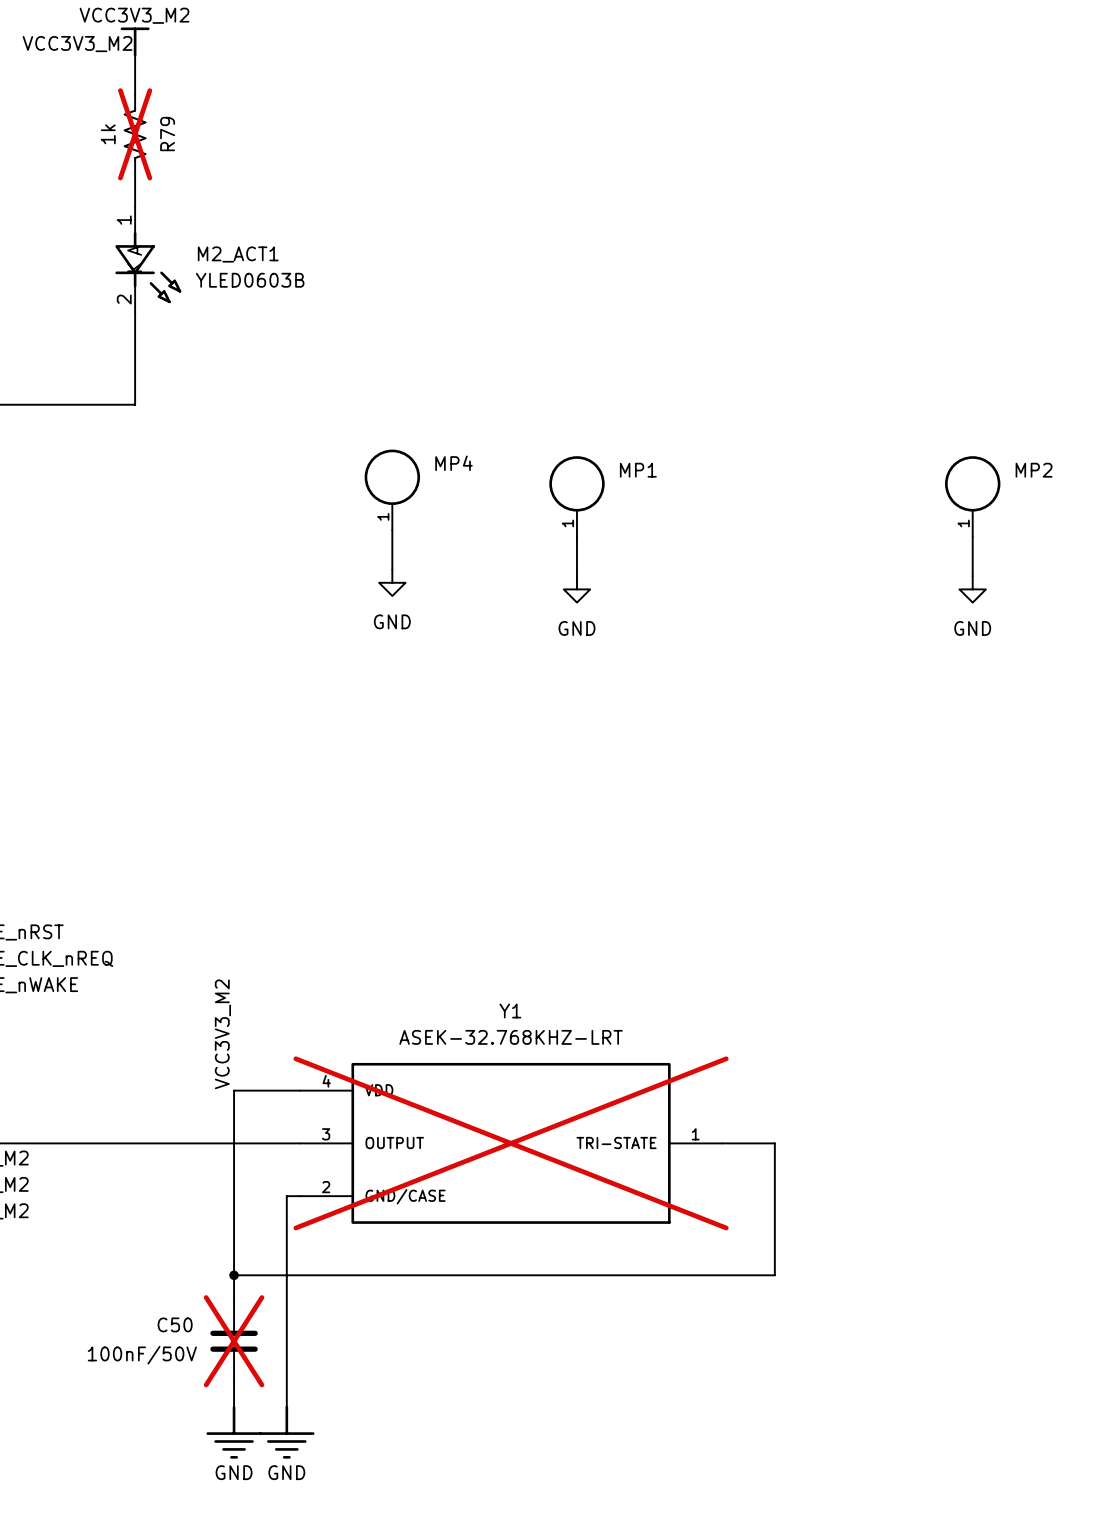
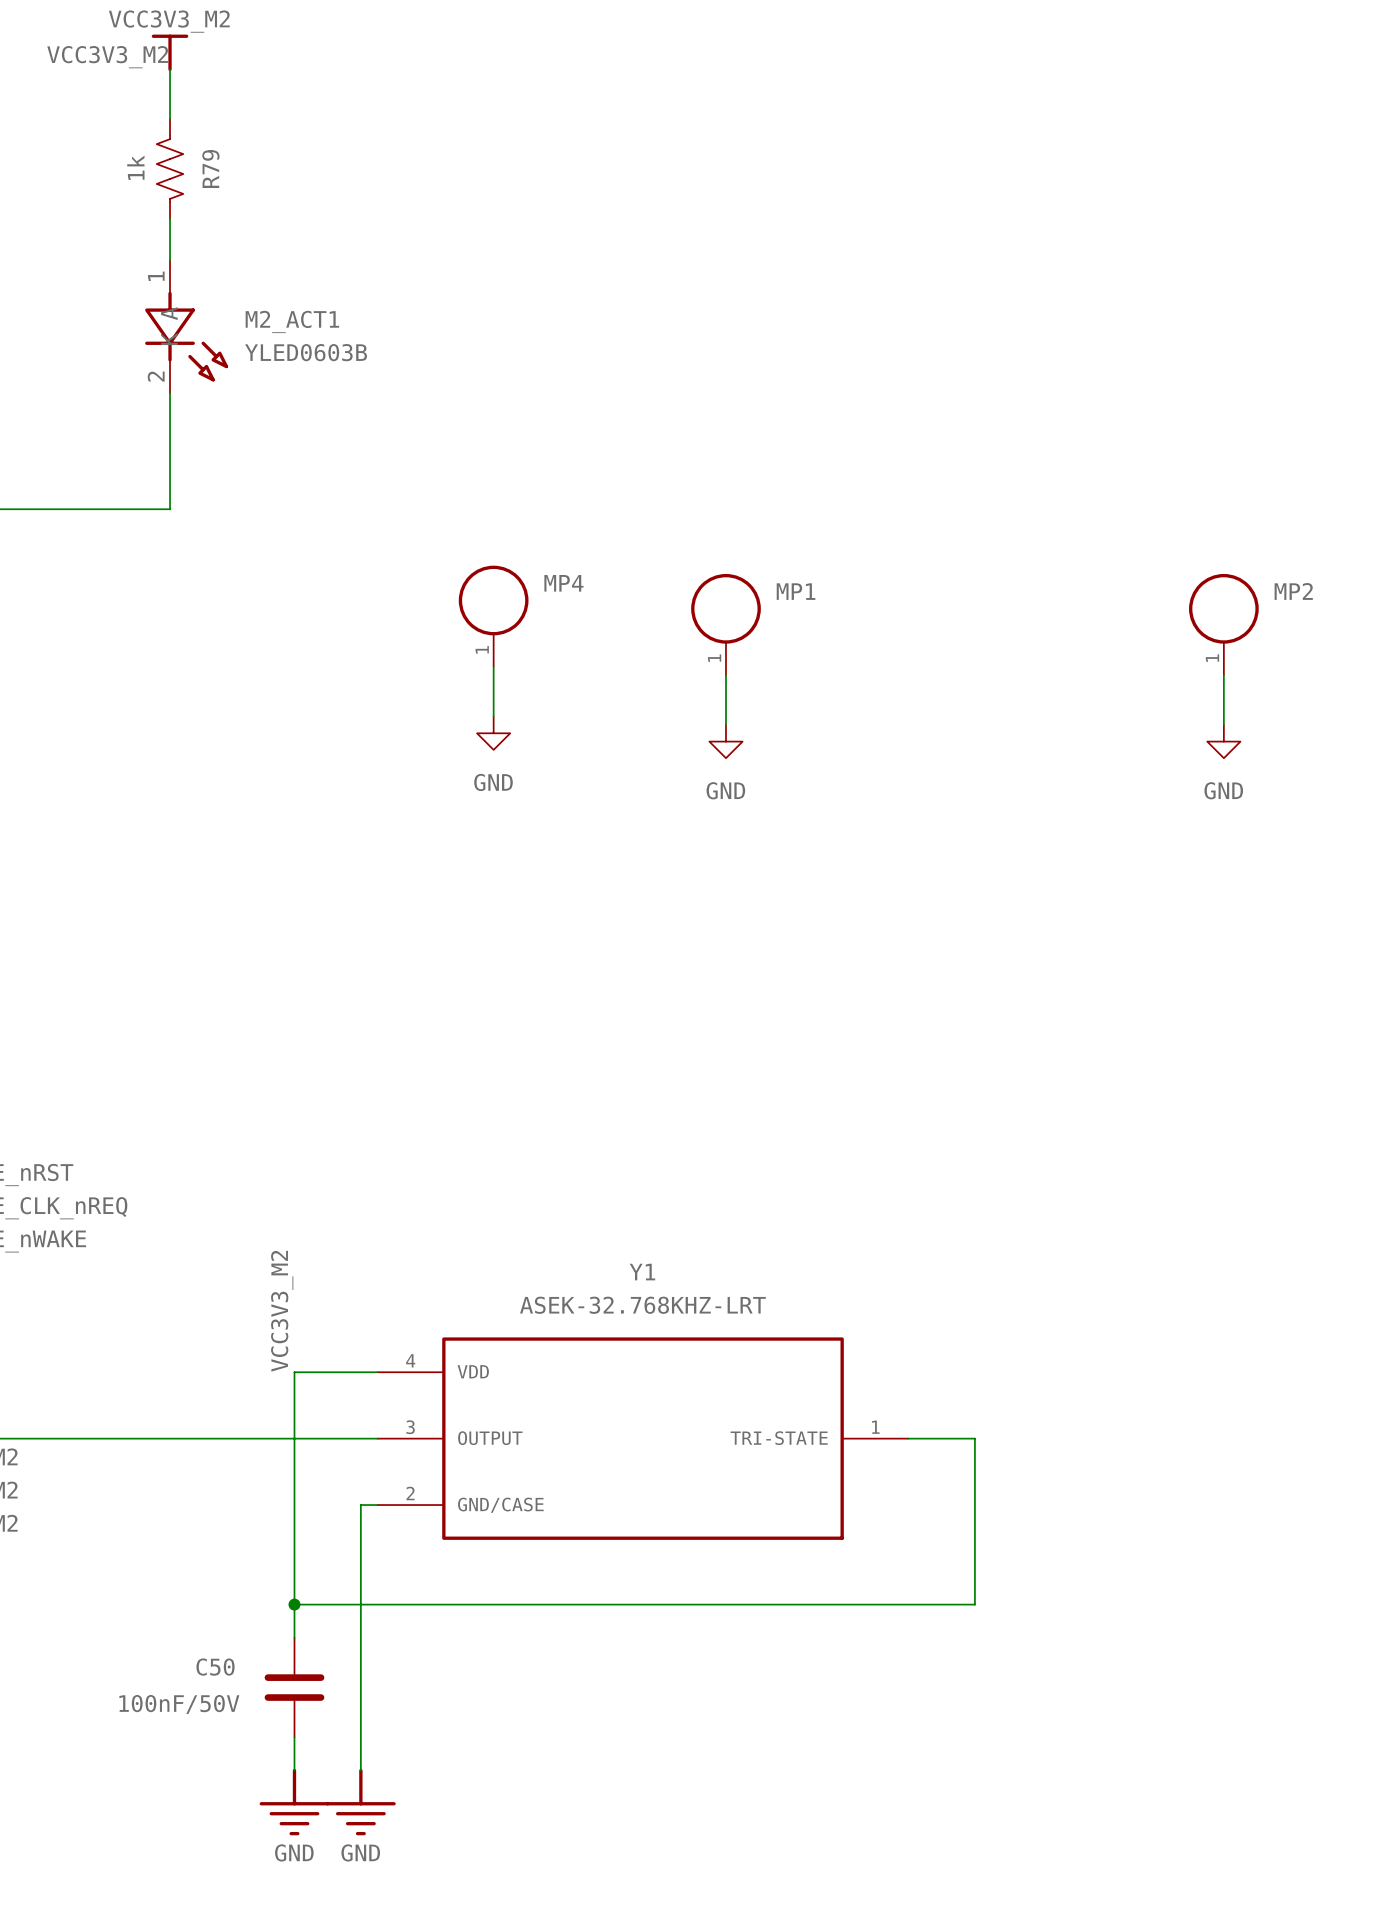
R79 do-not-place cross: (135, 134) -> none
Y1 do-not-place cross: (511, 1143) -> none
C50 do-not-place cross: (234, 1341) -> none

